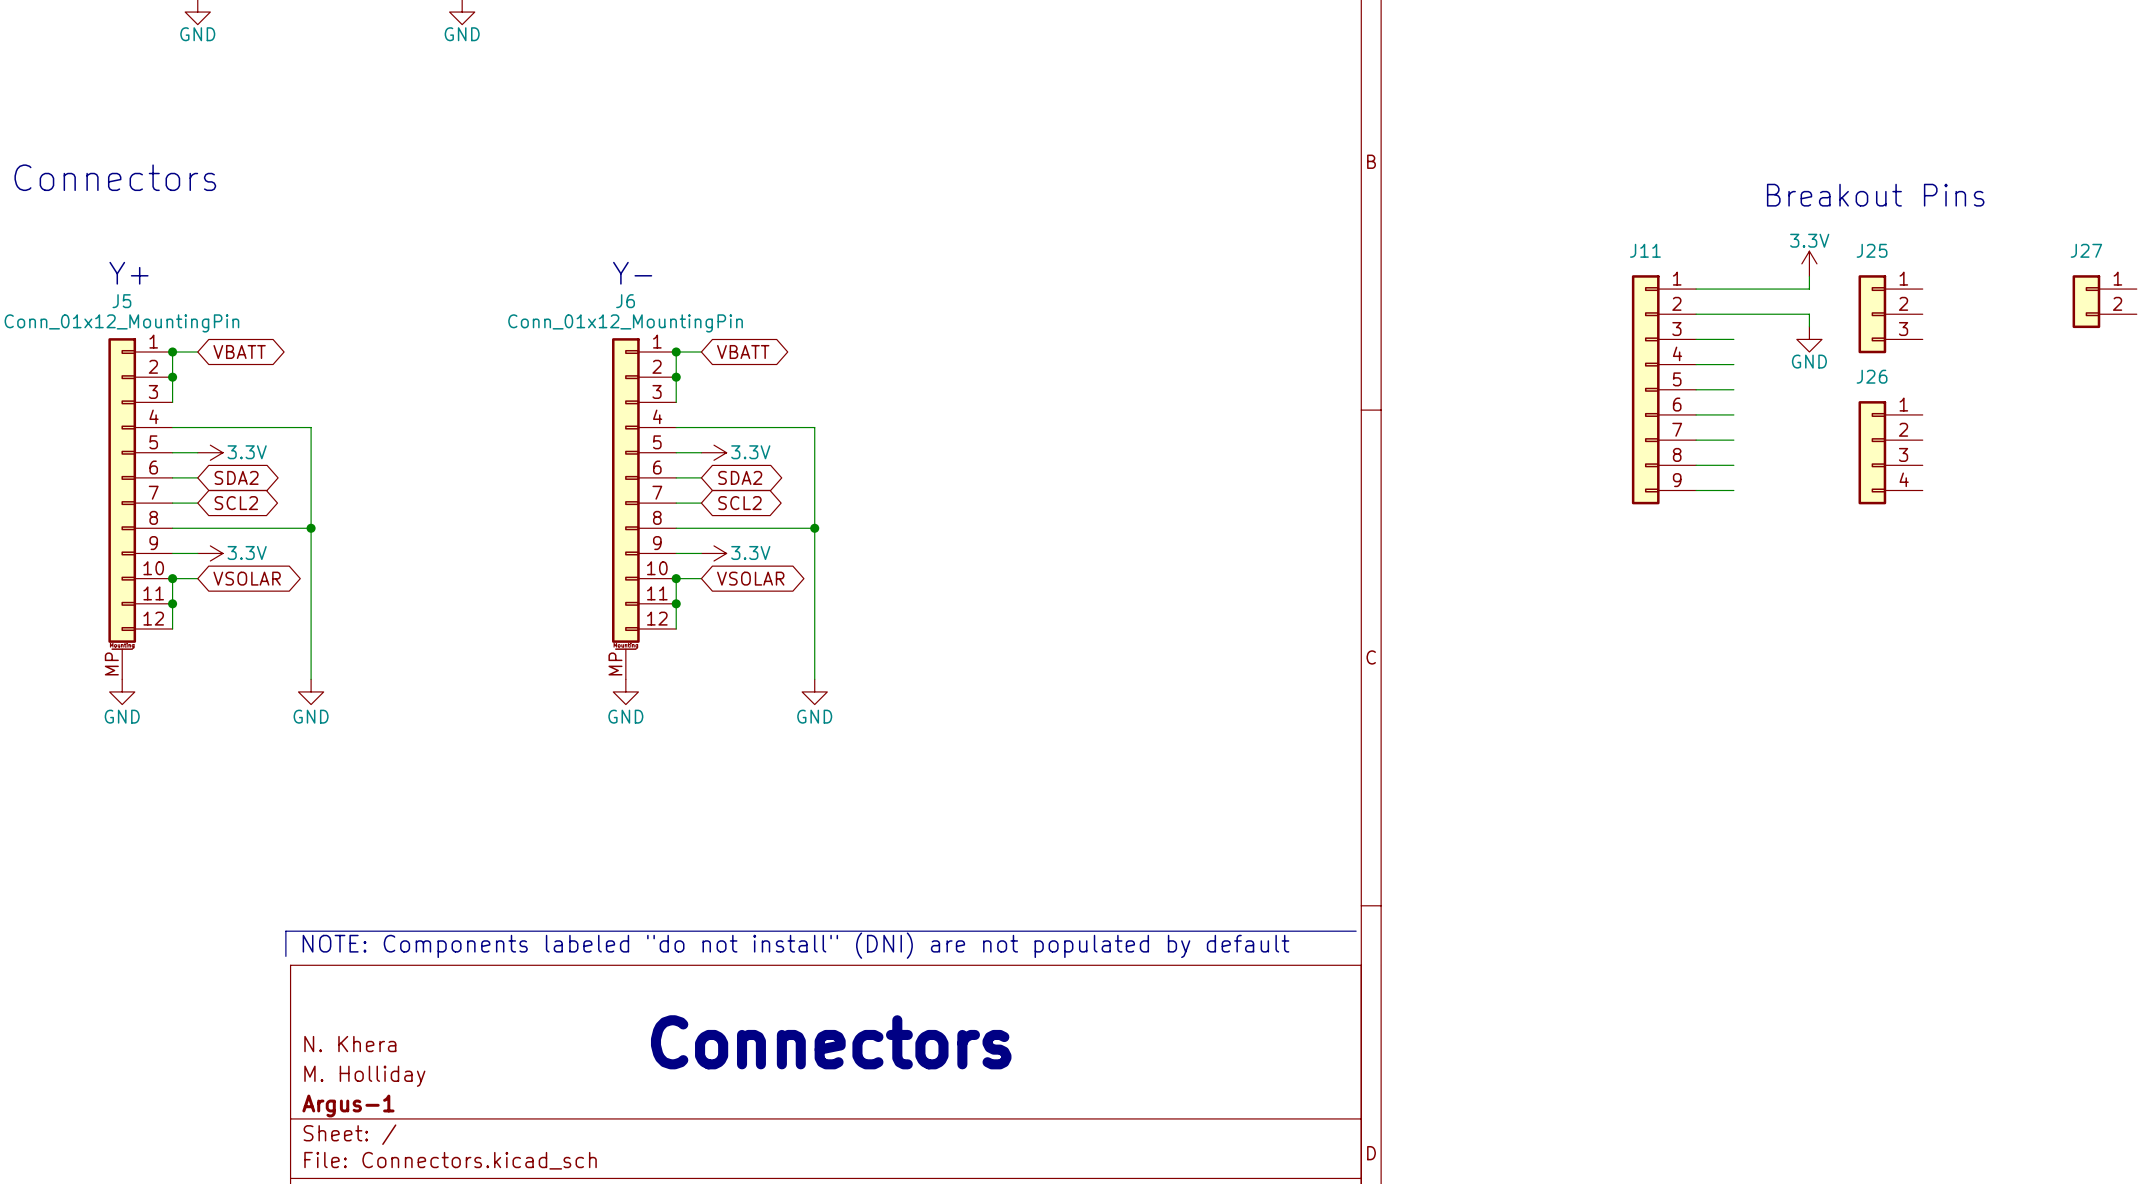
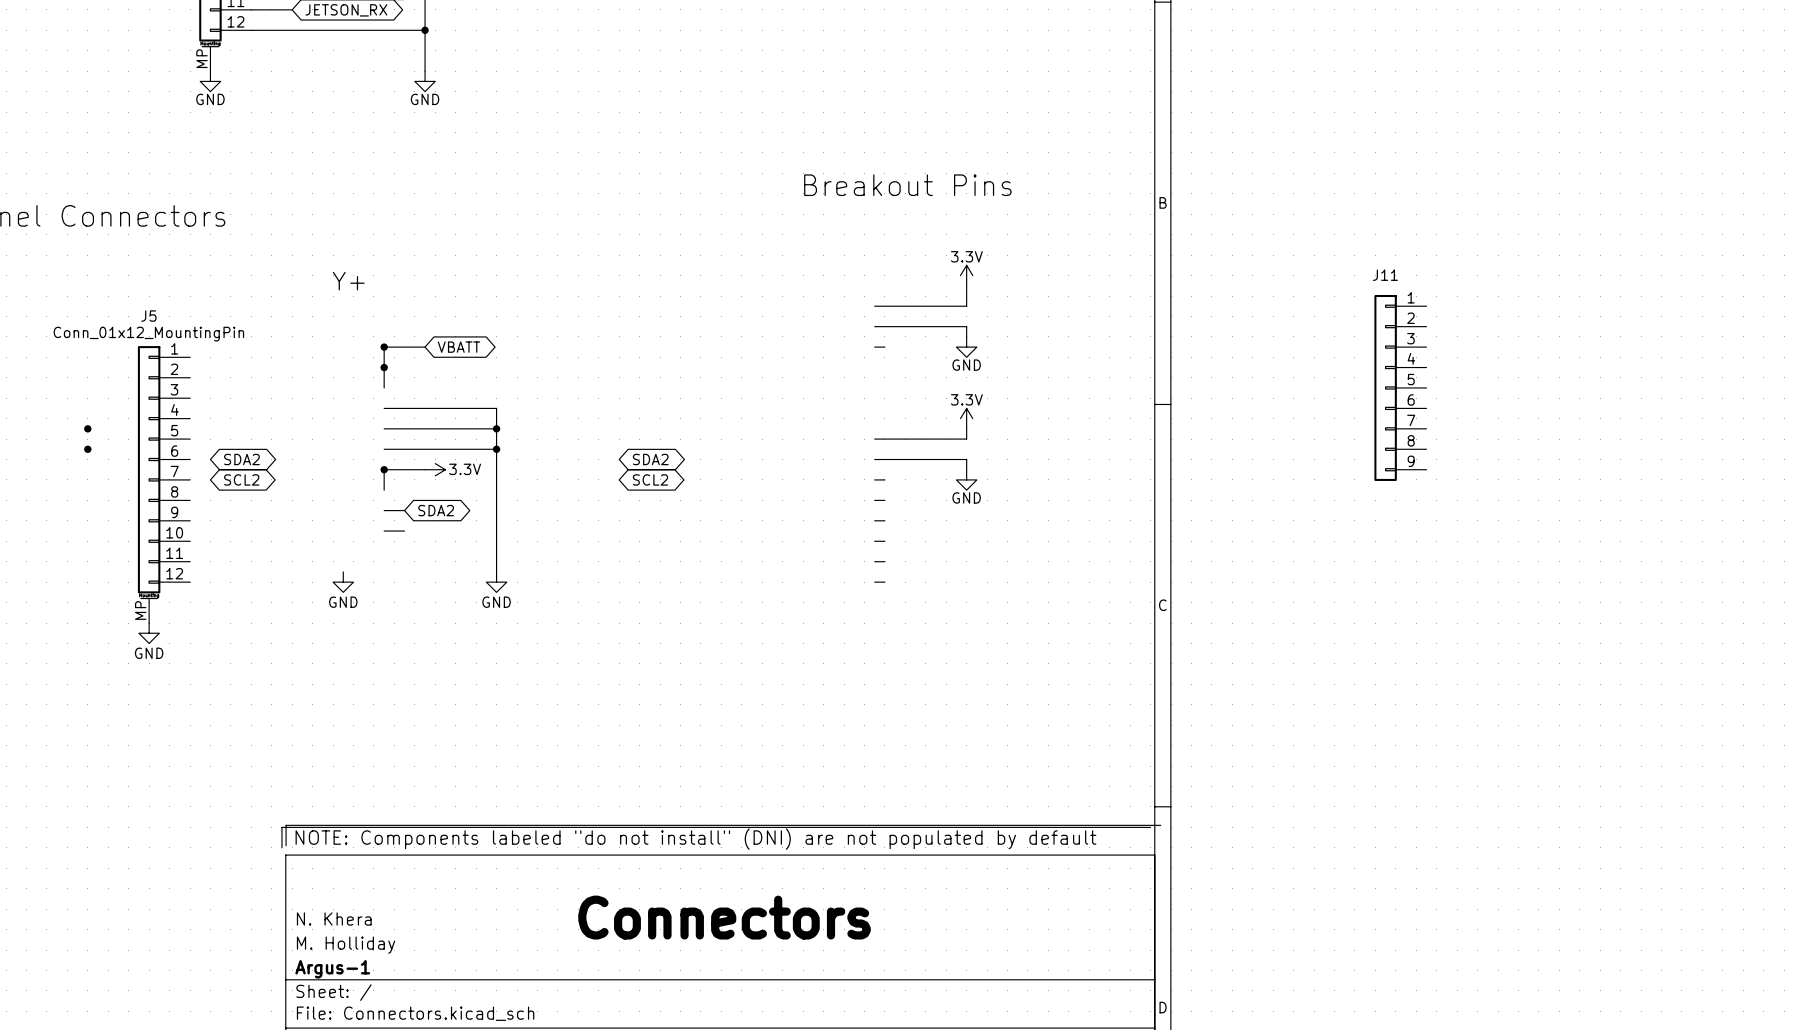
text: none -> Breakout Pins (907, 185)
text: Breakout Pins (1875, 195) -> none
power symbol: none -> 3.3V (966, 275)
wire: none -> (966, 285) (966, 306) (874, 306)
power symbol: 3.3V (1809, 263) -> none
text position: Y+ (129, 273) -> Y+ (348, 281)
text: Y- (632, 273) -> none
wire: (1809, 276) (1809, 289) (1696, 289) -> none
J27: (2104, 301) -> none
wire: none -> (874, 326) (966, 326) (966, 336)
wire: (1696, 314) (1809, 314) (1809, 326) -> none
J25: (1890, 314) -> none
junction: none -> (384, 347)
wire: none -> (425, 347) (384, 347) (384, 387)
global label: none -> VBATT (459, 347)
wire: none -> (874, 347) (884, 347)
power symbol: none -> GND (966, 347)
wire: (1696, 339) (1733, 339) -> none
power symbol: GND (1809, 339) -> none
junction: (172, 352) -> none
wire: (197, 352) (172, 352) (172, 402) -> none
global label: VBATT (239, 352) -> none
junction: (676, 352) -> none
wire: (701, 352) (676, 352) (676, 402) -> none
global label: VBATT (743, 352) -> none
junction: none -> (384, 367)
wire: (1696, 364) (1733, 364) -> none
junction: (172, 377) -> none
junction: (676, 377) -> none
wire: (1696, 389) (1733, 389) -> none
wire: none -> (384, 408) (496, 408) (496, 571)
wire: (1696, 414) (1733, 414) -> none
wire: (172, 427) (311, 427) (311, 679) -> none
wire: (676, 427) (814, 427) (814, 679) -> none
power symbol: none -> 3.3V (966, 418)
junction: none -> (87, 428)
wire: none -> (384, 428) (496, 428)
junction: none -> (496, 428)
wire: none -> (966, 428) (966, 439) (874, 439)
wire: (1696, 440) (1733, 440) -> none
wire: (172, 452) (197, 452) -> none
power symbol: 3.3V (210, 452) -> none
wire: (676, 452) (701, 452) -> none
power symbol: 3.3V (713, 452) -> none
J26: (1890, 452) -> none
junction: none -> (87, 449)
junction: none -> (496, 449)
wire: (1696, 465) (1733, 465) -> none
wire: (172, 477) (197, 477) -> (384, 510) (404, 510)
wire: (676, 477) (701, 477) -> none
wire: none -> (874, 459) (966, 459) (966, 469)
junction: none -> (384, 469)
wire: none -> (425, 469) (384, 469) (384, 490)
power symbol: none -> 3.3V (435, 469)
wire: (1696, 490) (1733, 490) -> none
wire: (172, 503) (197, 503) -> (384, 531) (404, 531)
wire: (676, 503) (701, 503) -> none
wire: none -> (874, 479) (884, 479)
power symbol: none -> GND (966, 479)
J6: Conn_01x12_MountingPin (644, 508) -> none
wire: (172, 528) (311, 528) -> (384, 449) (496, 449)
junction: (311, 528) -> none
wire: (676, 528) (814, 528) -> none
junction: (814, 528) -> none
wire: none -> (874, 500) (884, 500)
global label: none -> SDA2 (436, 510)
wire: (172, 553) (197, 553) -> none
power symbol: 3.3V (210, 553) -> none
wire: (676, 553) (701, 553) -> none
power symbol: 3.3V (713, 553) -> none
wire: none -> (874, 520) (884, 520)
junction: (172, 578) -> none
wire: (197, 578) (172, 578) (172, 629) -> none
global label: VSOLAR (247, 578) -> none
junction: (676, 578) -> none
wire: (701, 578) (676, 578) (676, 629) -> none
global label: VSOLAR (750, 578) -> none
wire: none -> (874, 541) (884, 541)
junction: (172, 603) -> none
junction: (676, 603) -> none
wire: none -> (874, 561) (884, 561)
wire: none -> (874, 582) (884, 582)
power symbol position: GND (311, 691) -> GND (343, 582)
power symbol position: GND (625, 691) -> GND (496, 582)
power symbol: GND (814, 691) -> none
line: none -> (1160, 825) (286, 825) (286, 845)

